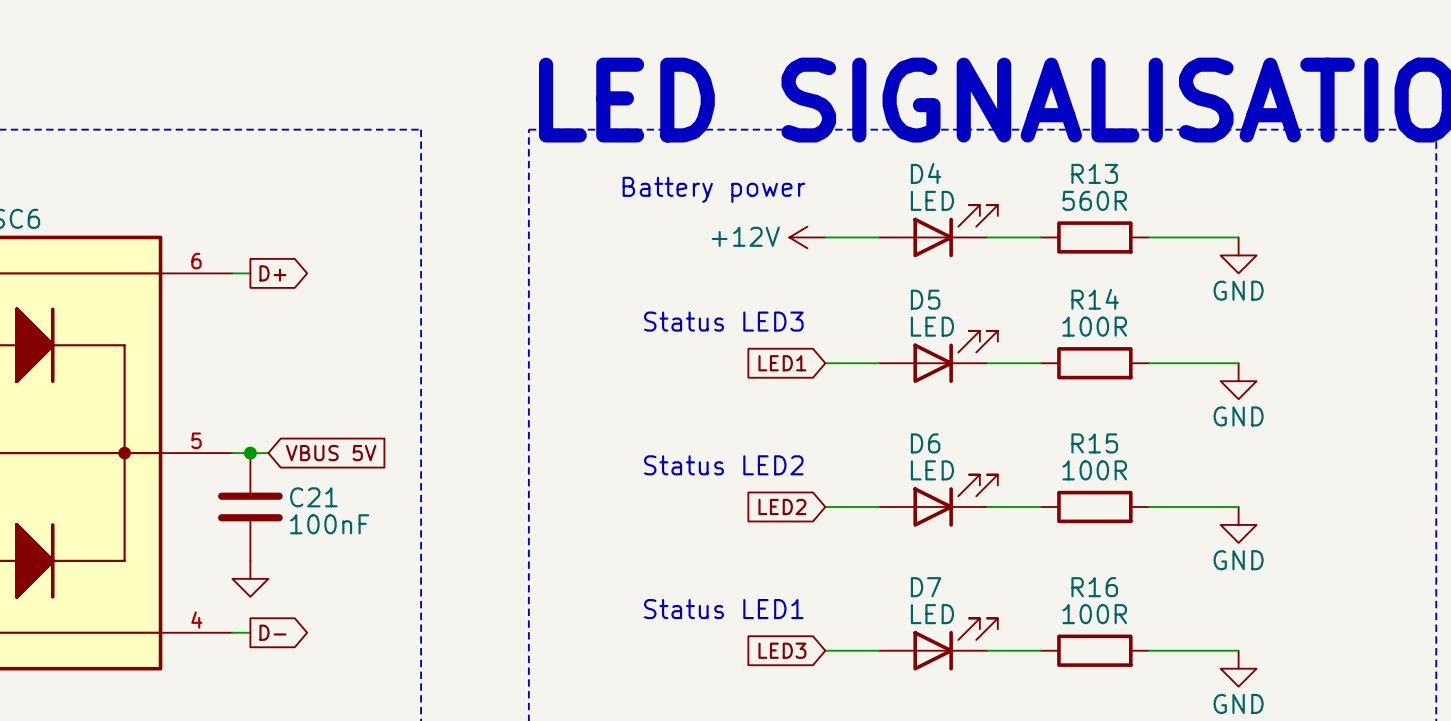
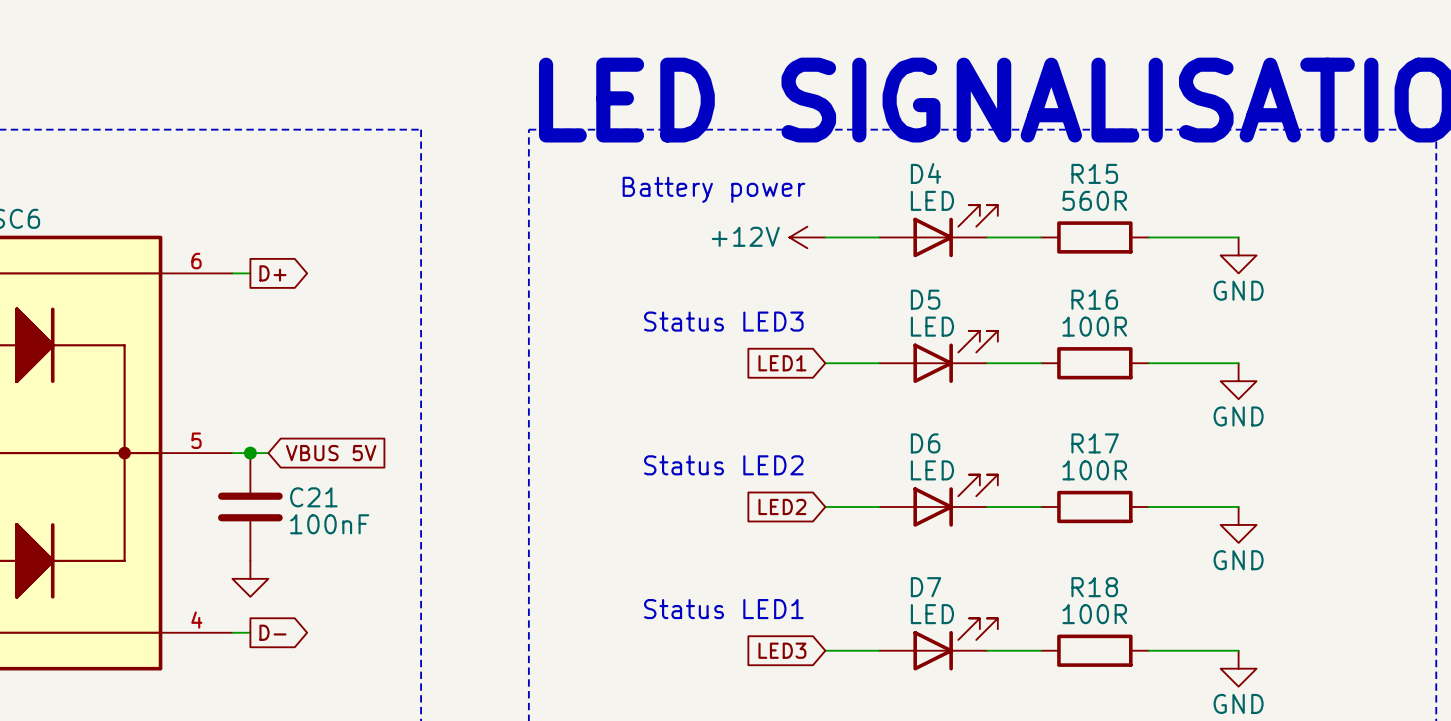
R13 name: R13 (1094, 173) -> R15 (1094, 173)
R14 name: R14 (1095, 299) -> R16 (1094, 299)
R15 name: R15 (1094, 443) -> R17 (1095, 443)
R16 name: R16 (1094, 587) -> R18 (1094, 587)

